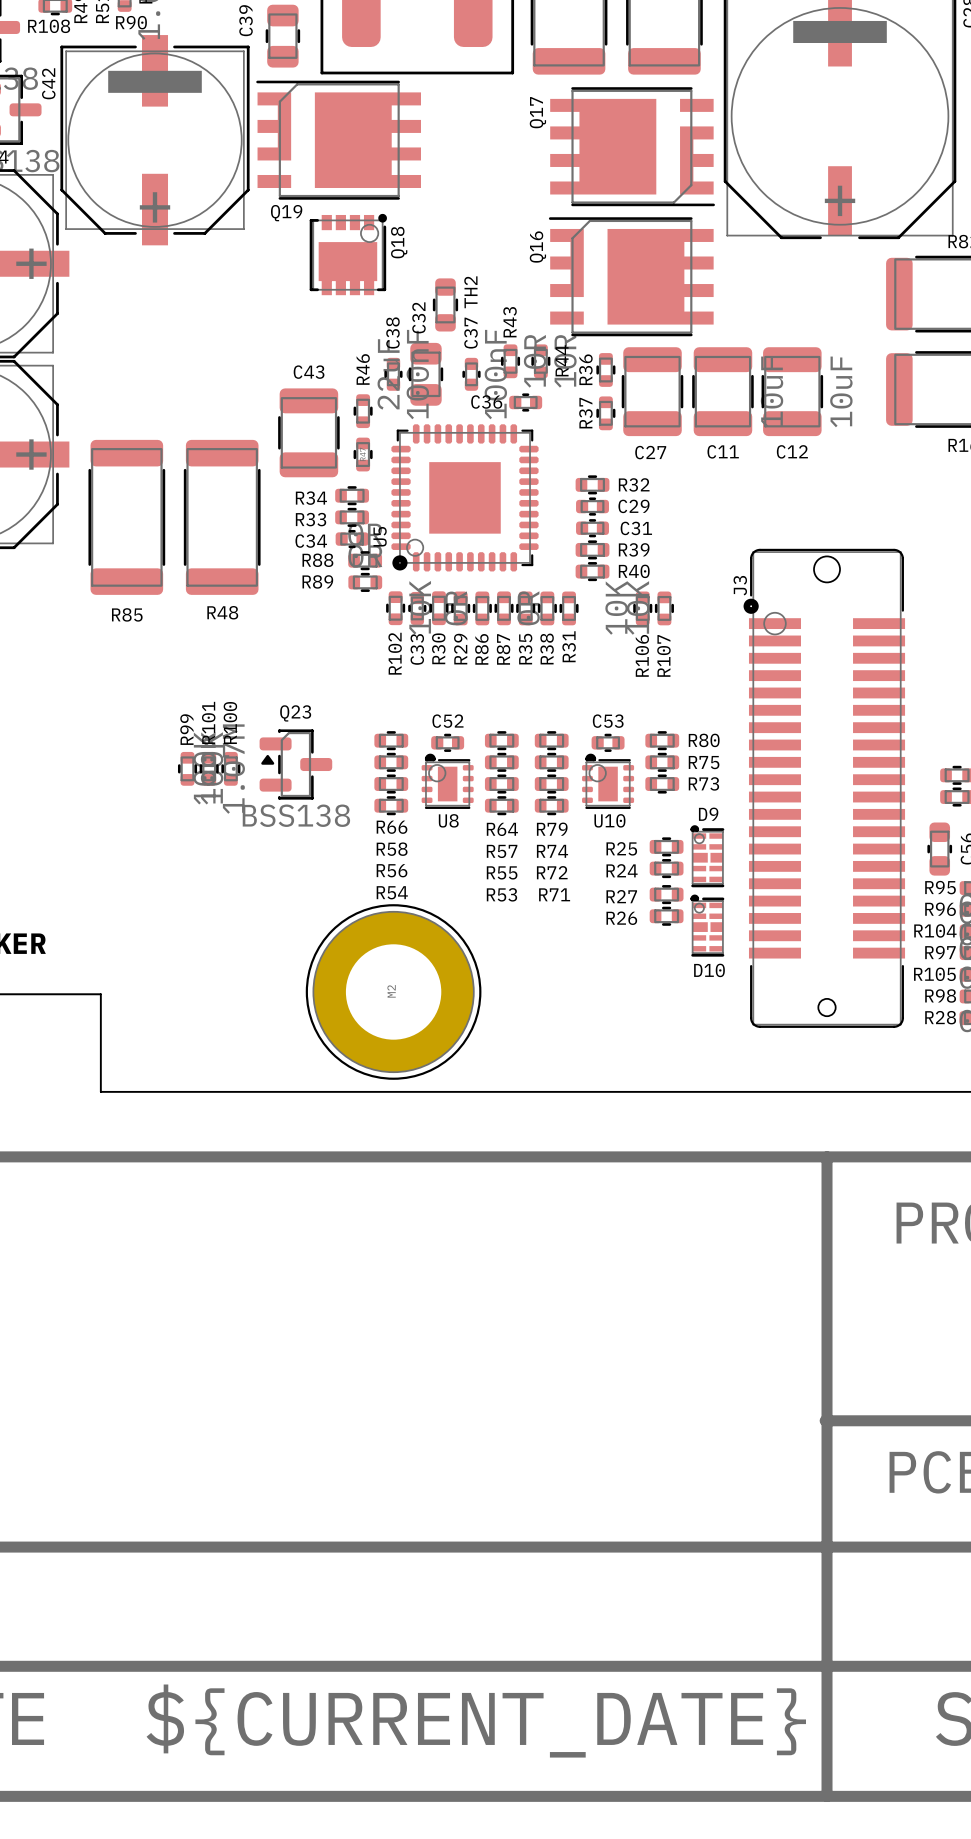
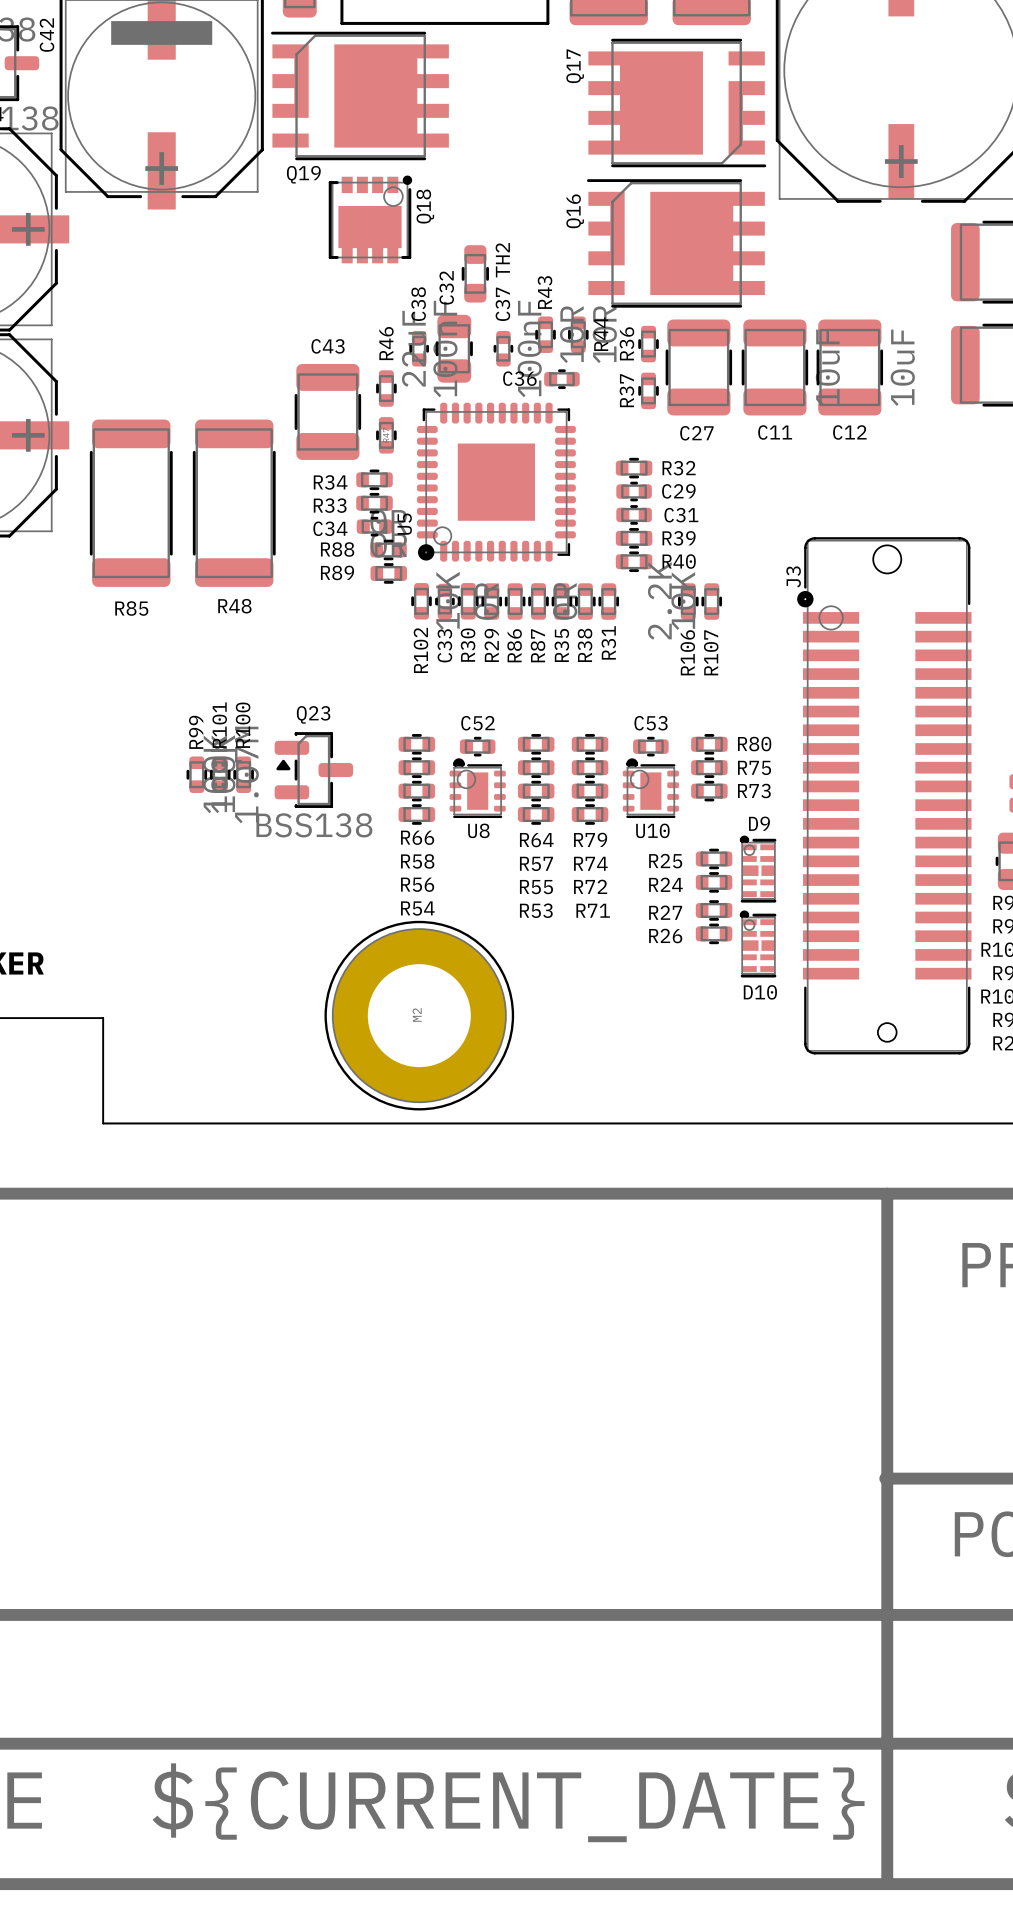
R106 value: 10K (616, 607) -> 2.2K (660, 600)

